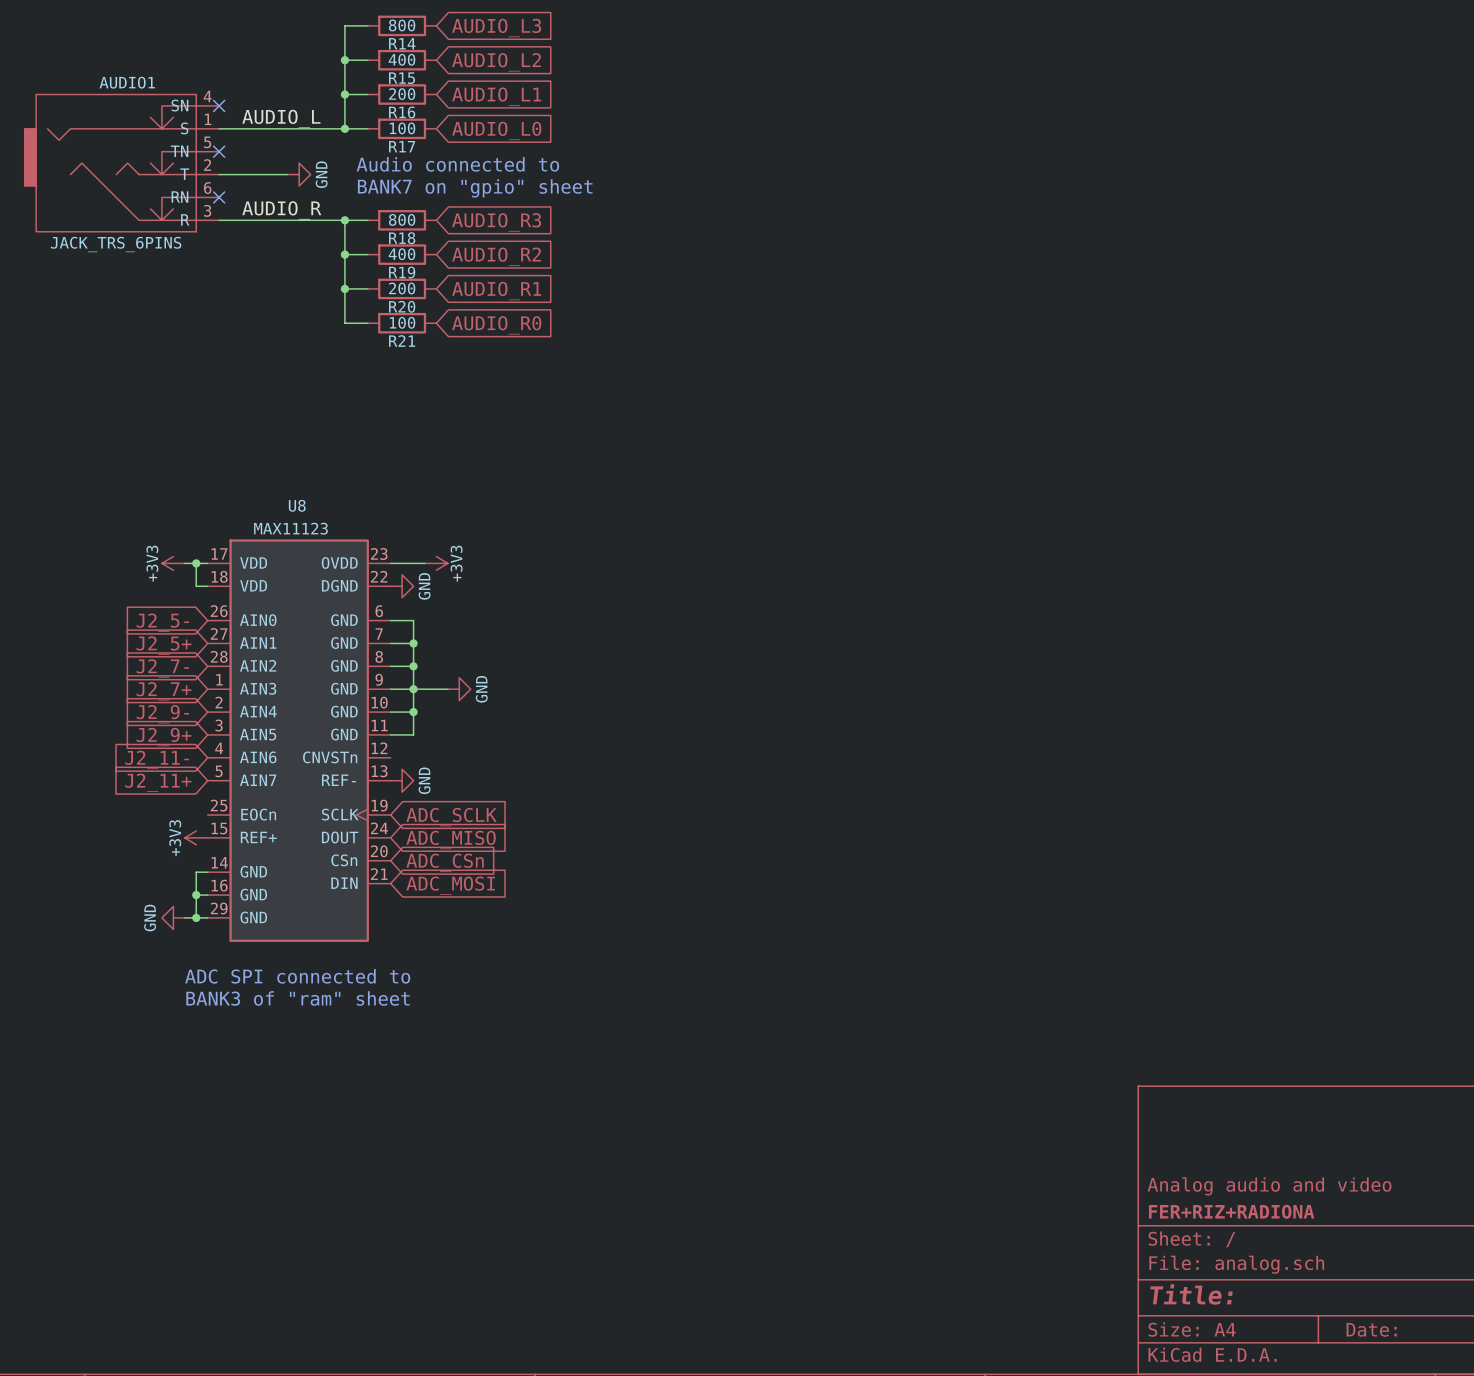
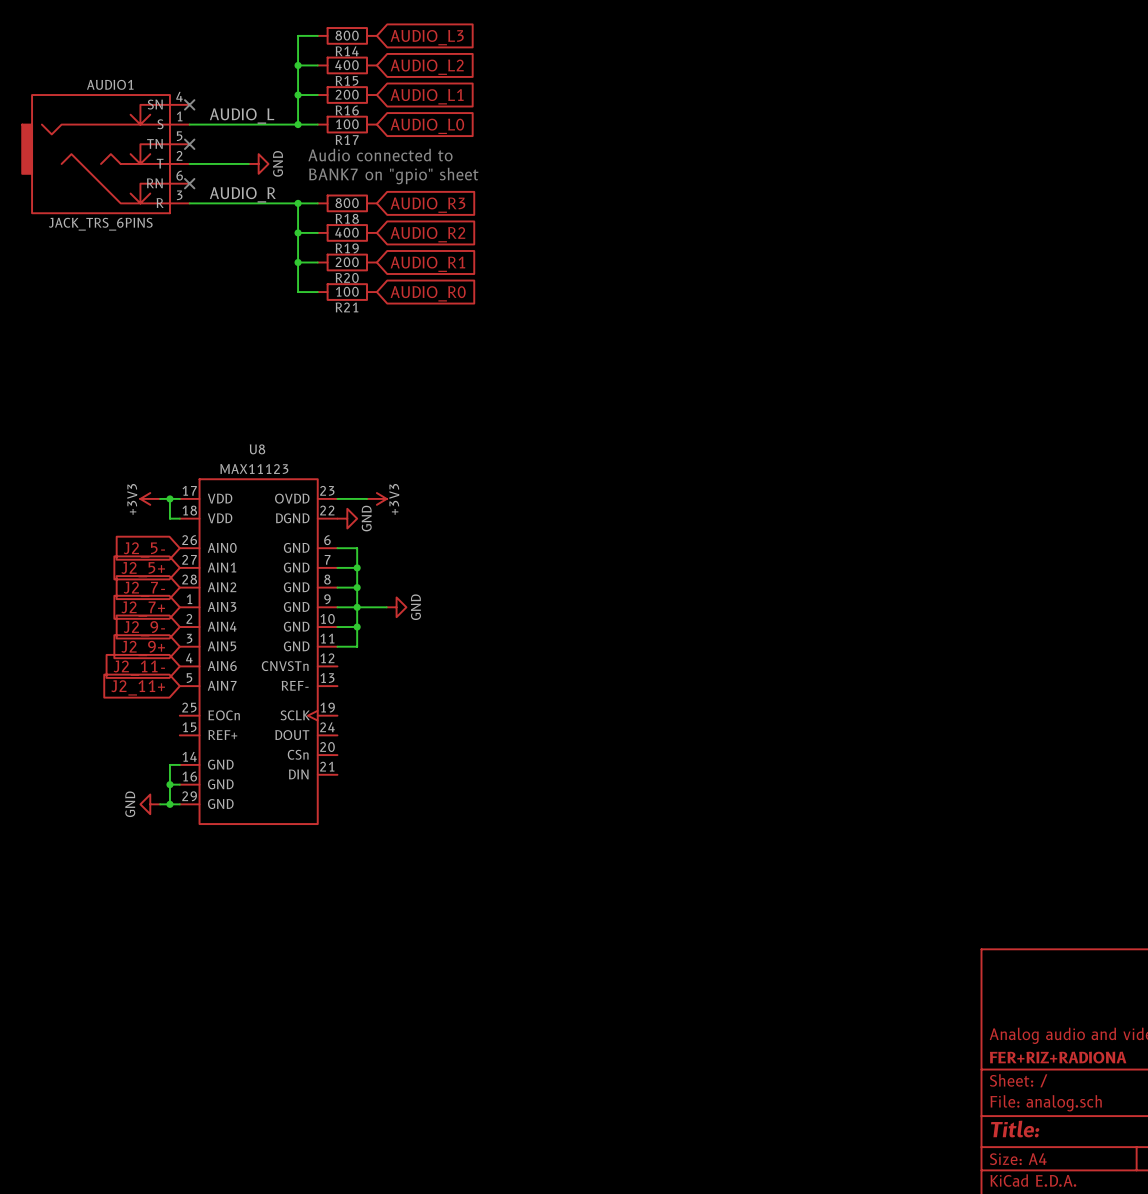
power symbol: GND (402, 780) -> none
global label: ADC_SCLK (451, 817) -> none
power symbol: +3V3 (196, 837) -> none
global label: ADC_MISO (451, 839) -> none
global label: ADC_CSn (445, 862) -> none
global label: ADC_MOSI (450, 885) -> none
text: ADC SPI connected to (297, 976) -> none
text: BANK3 of "ram" sheet (297, 998) -> none

